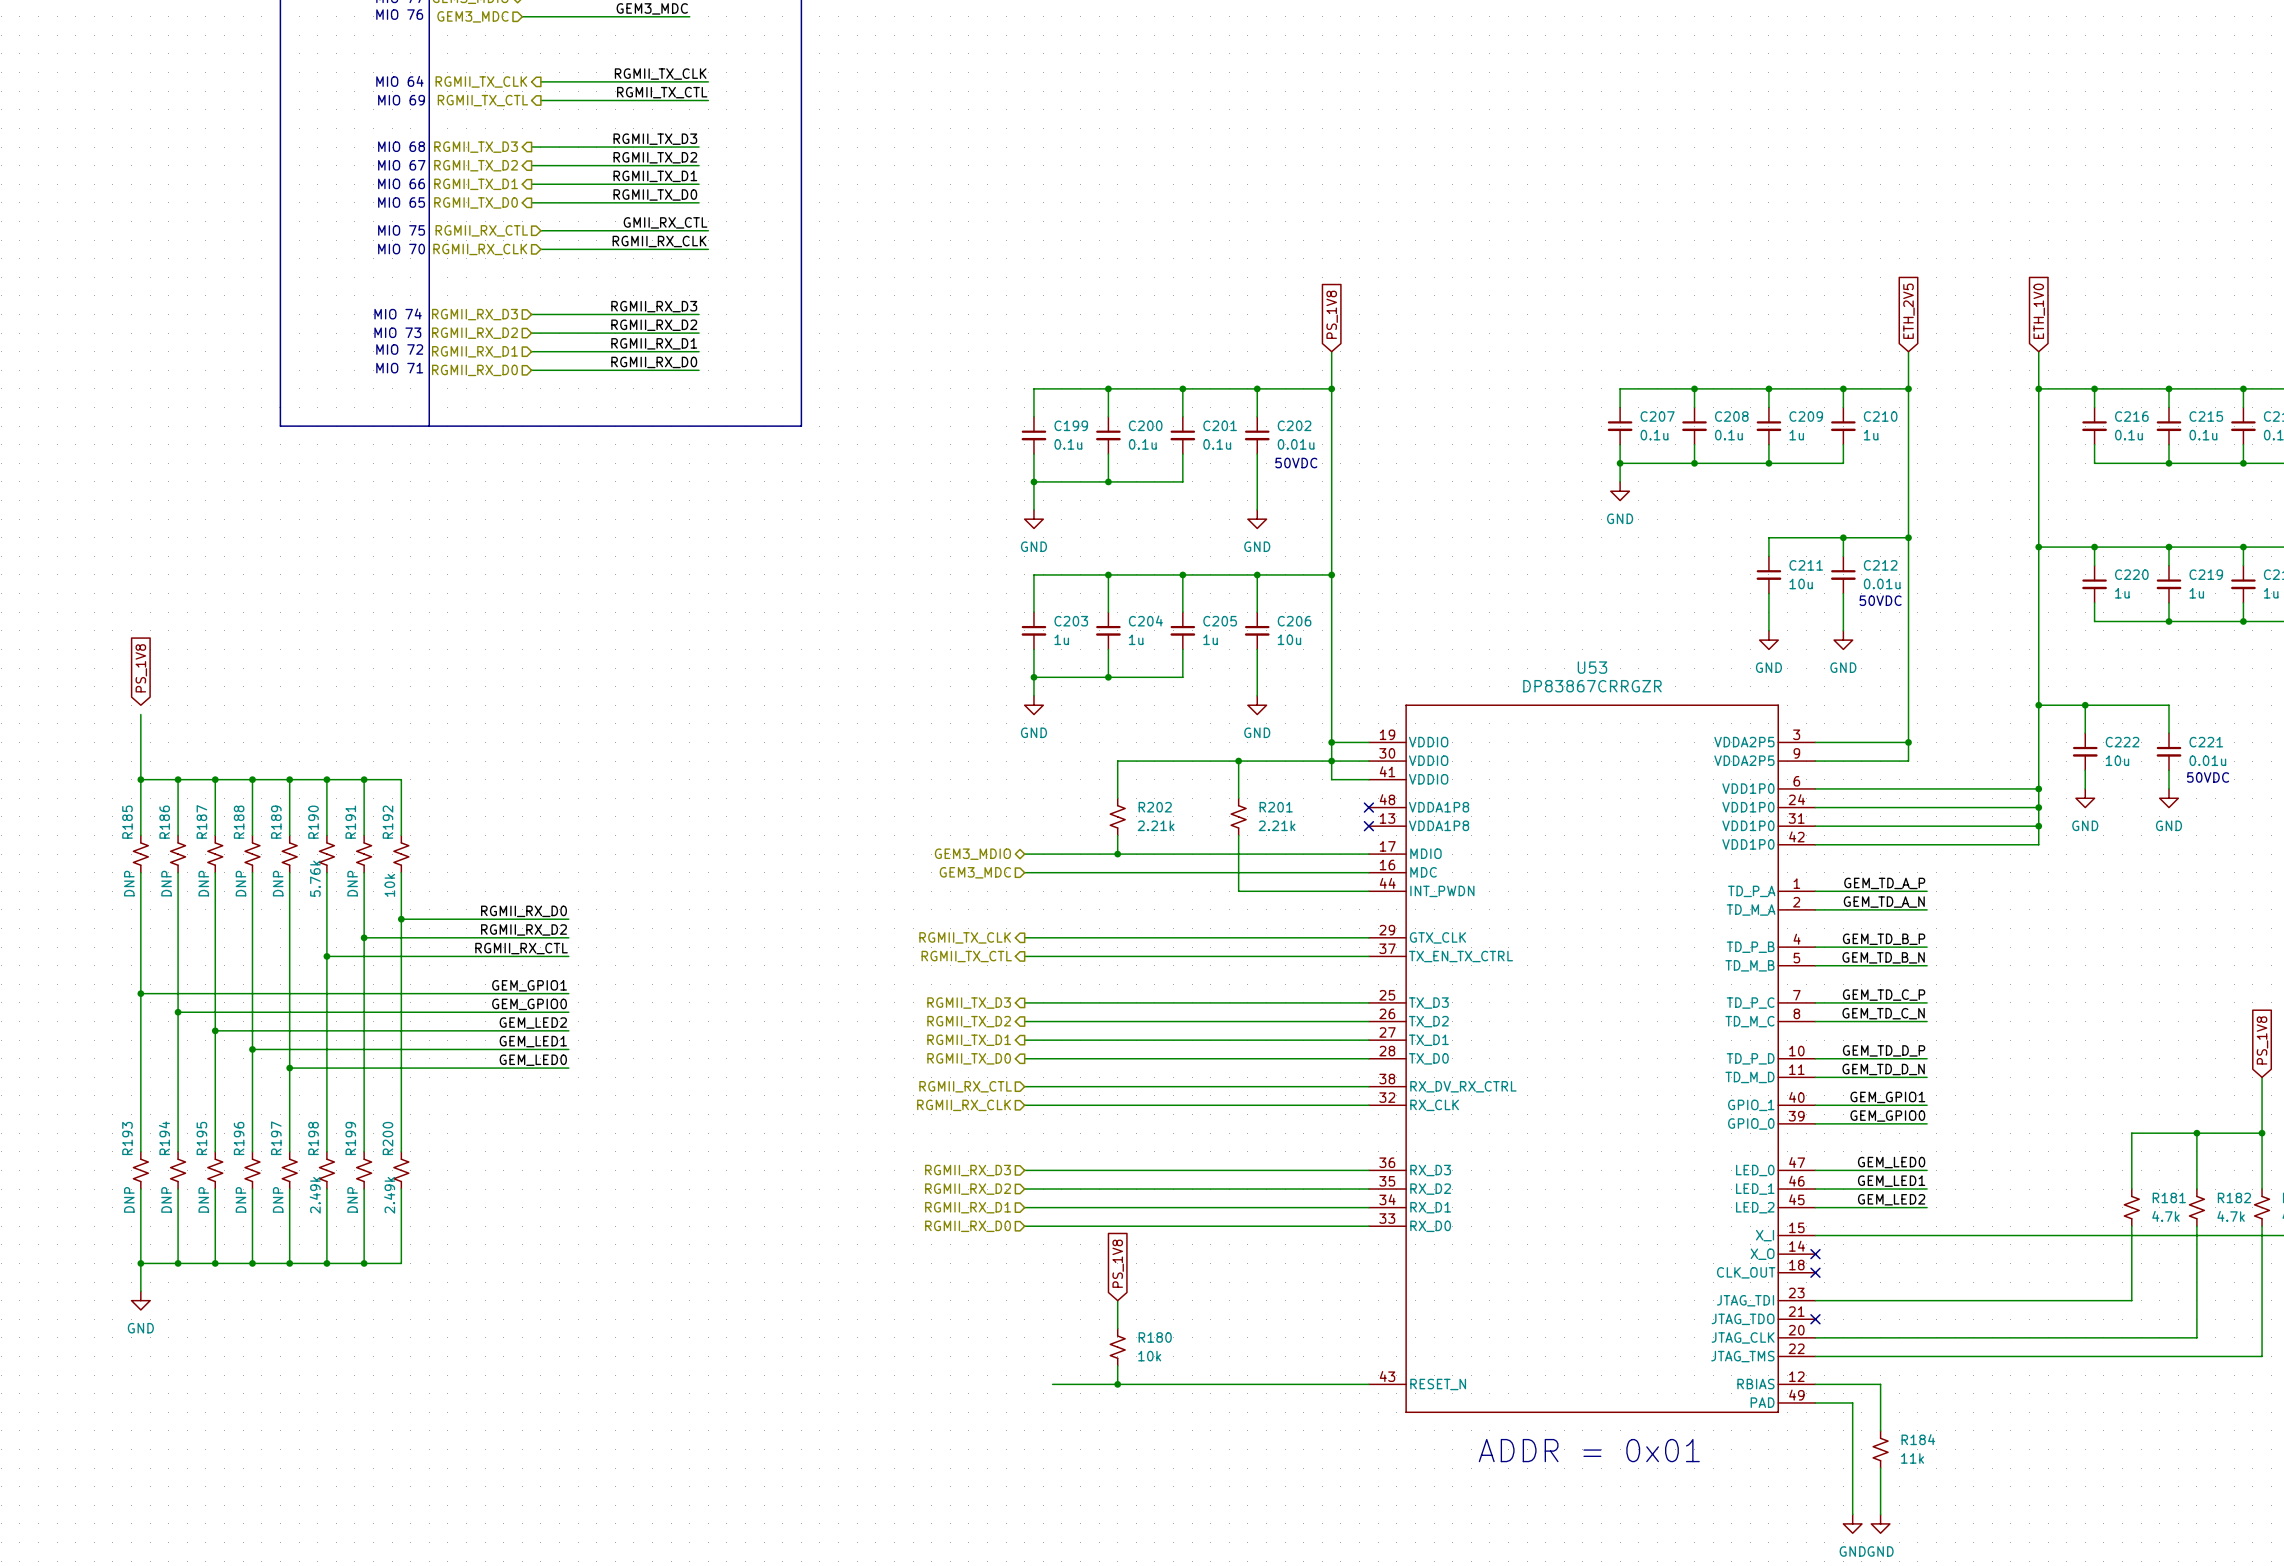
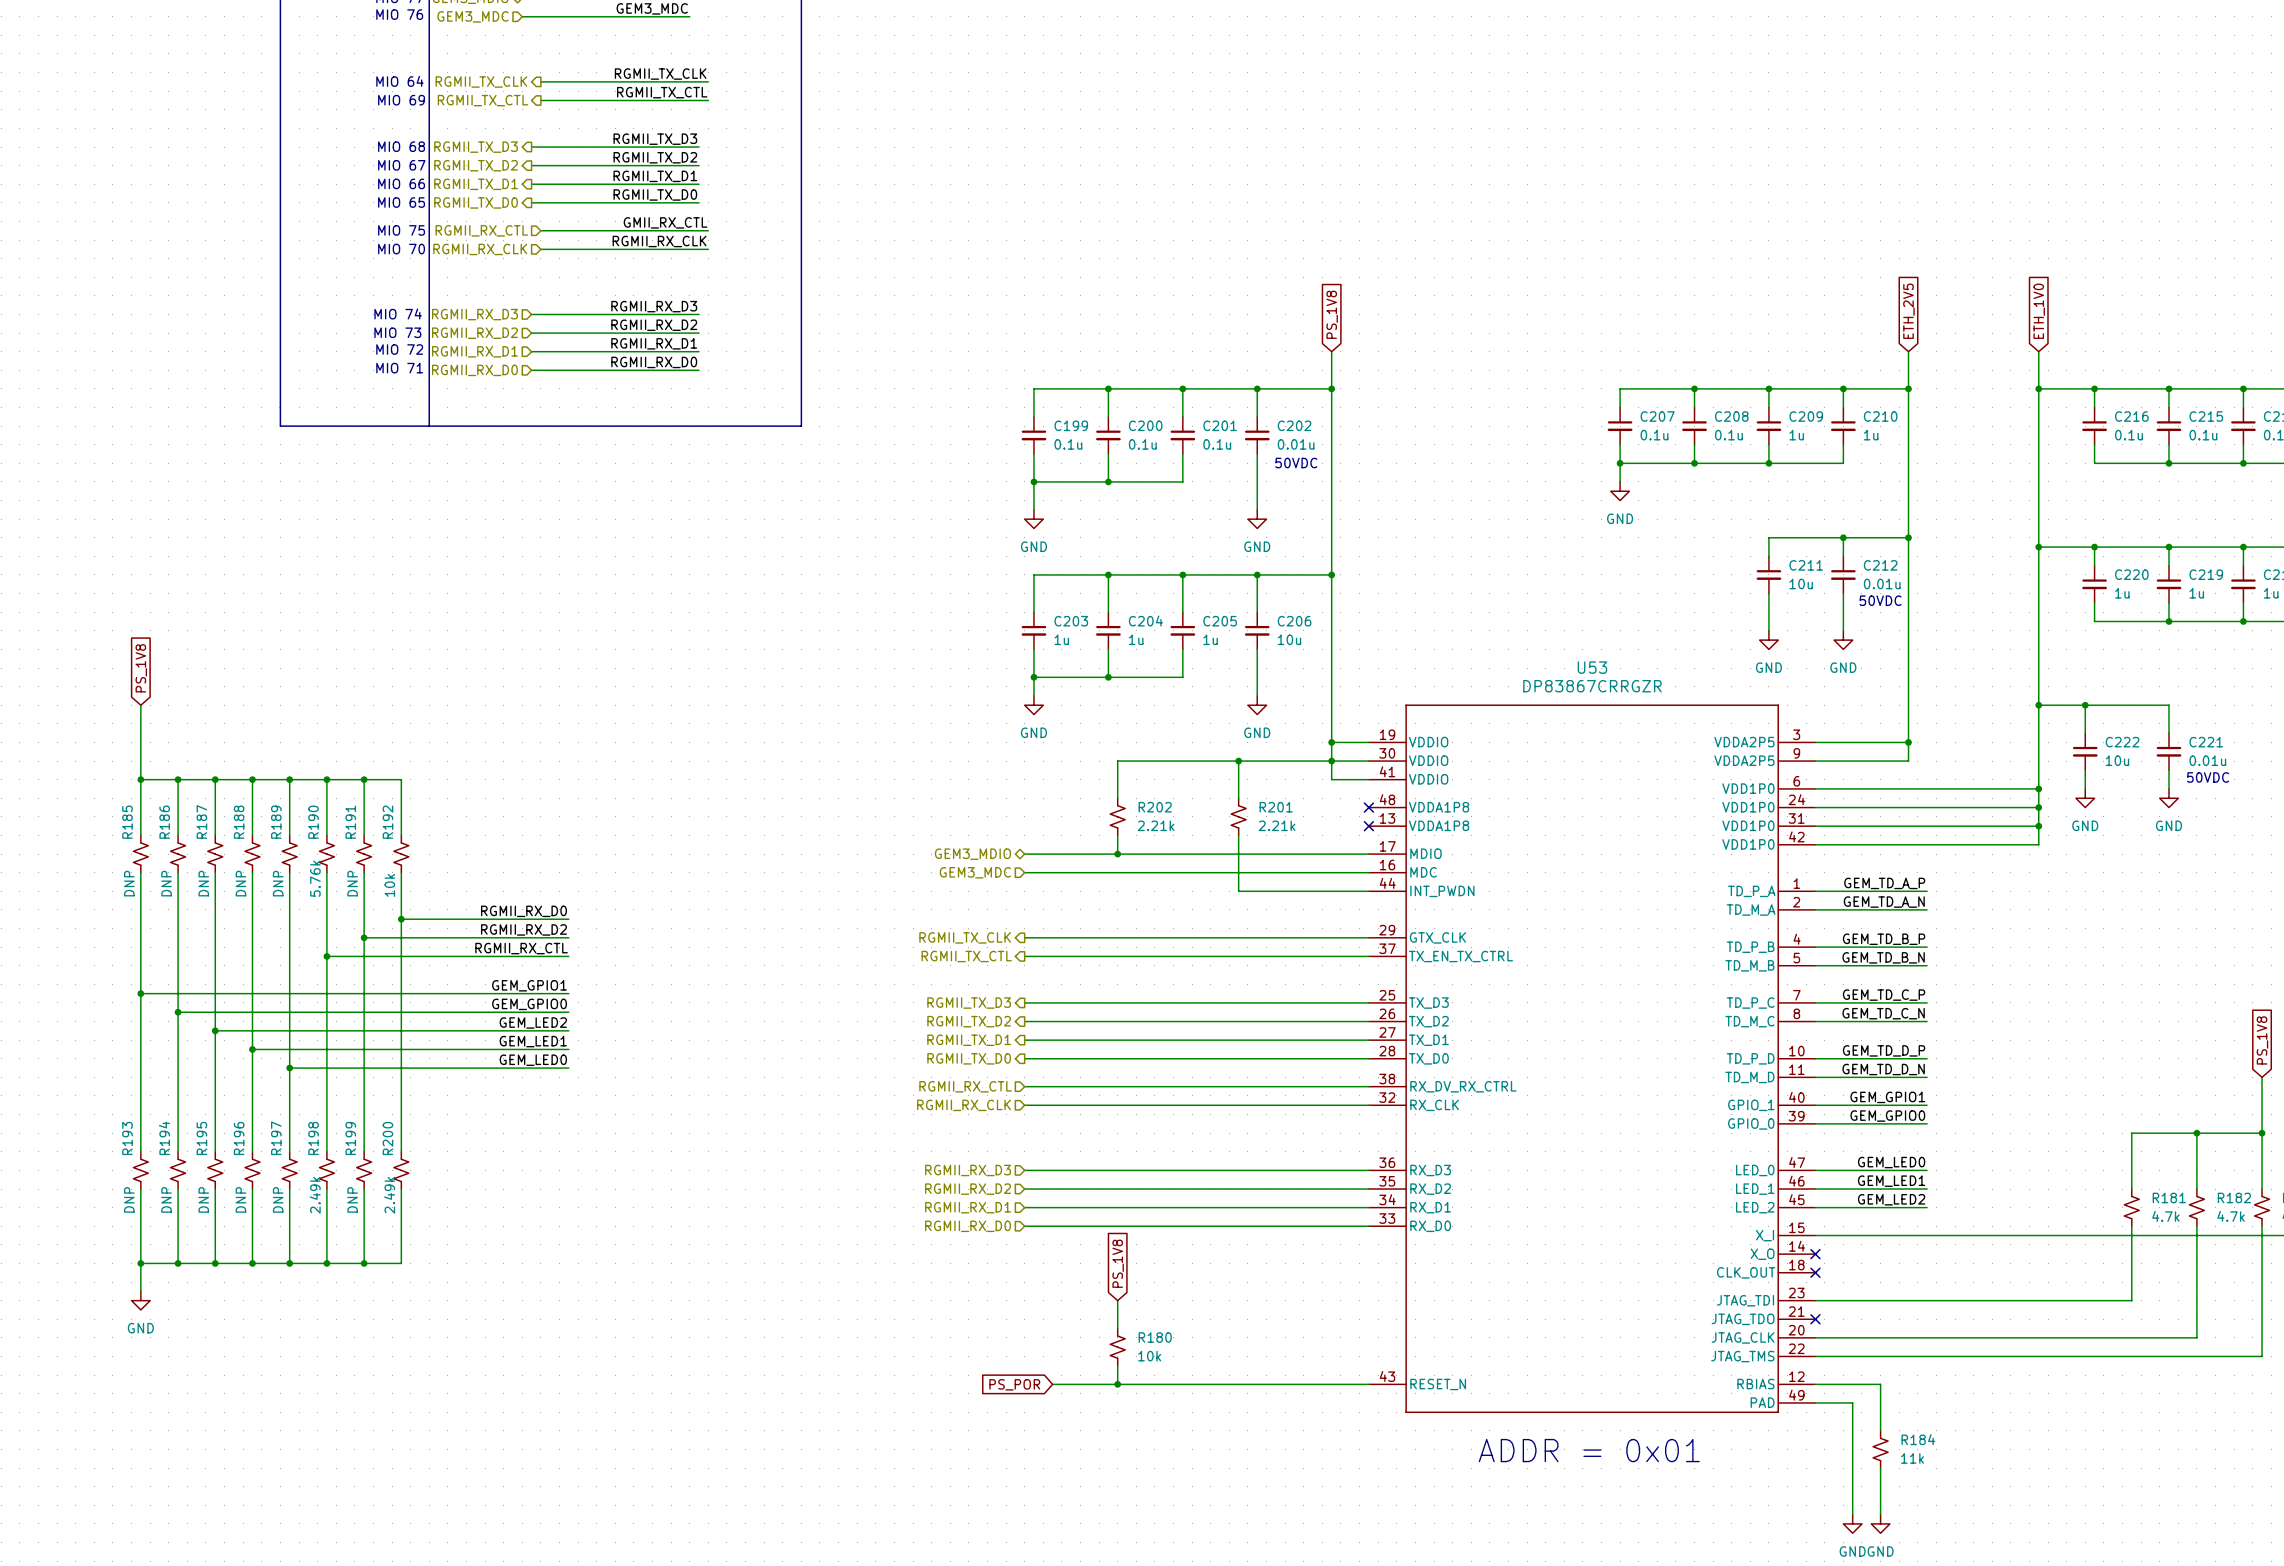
wire: none -> (140, 705) (140, 714)
global label: none -> PS_POR (1014, 1384)

